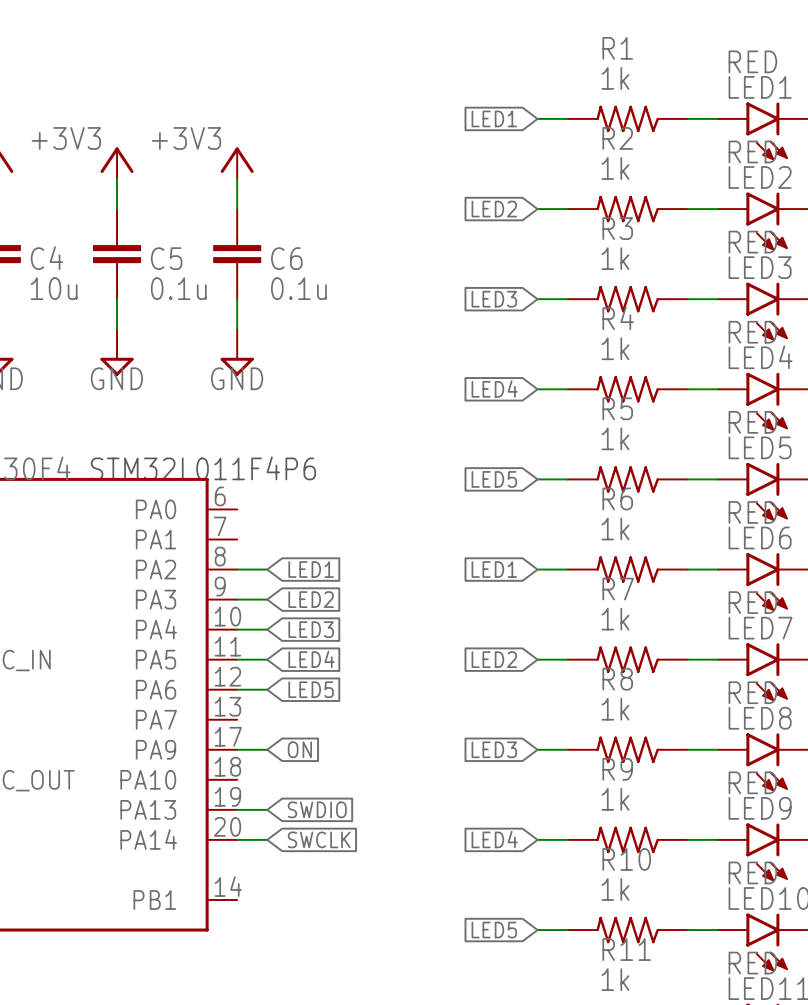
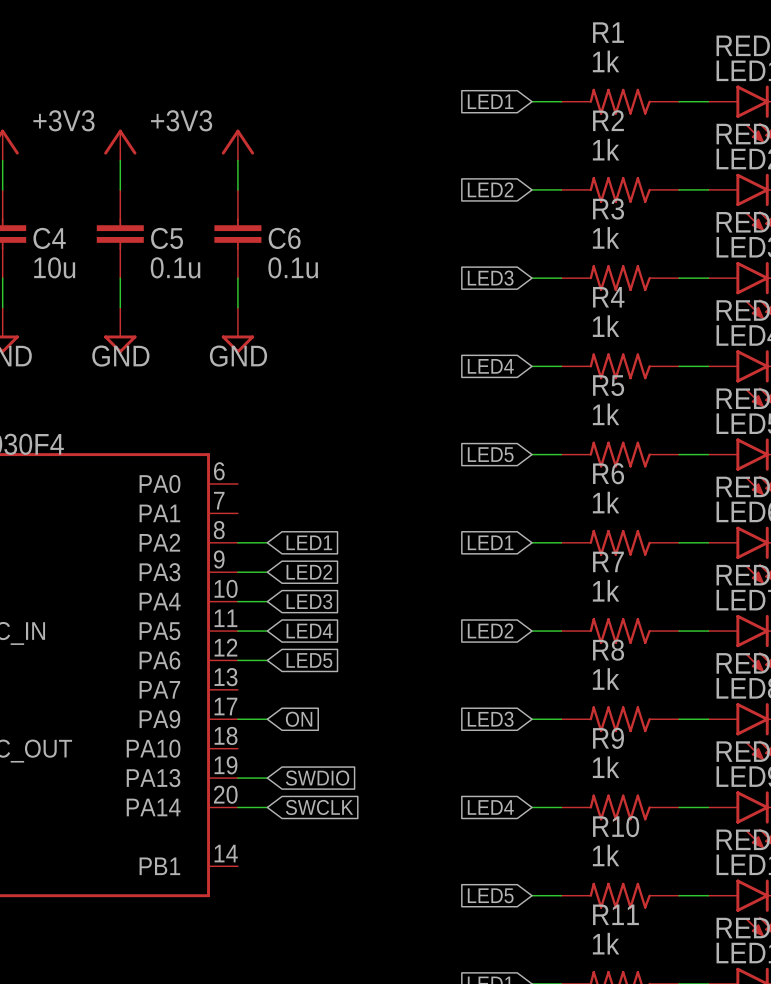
text: STM32L011F4P6 (203, 468) -> none

